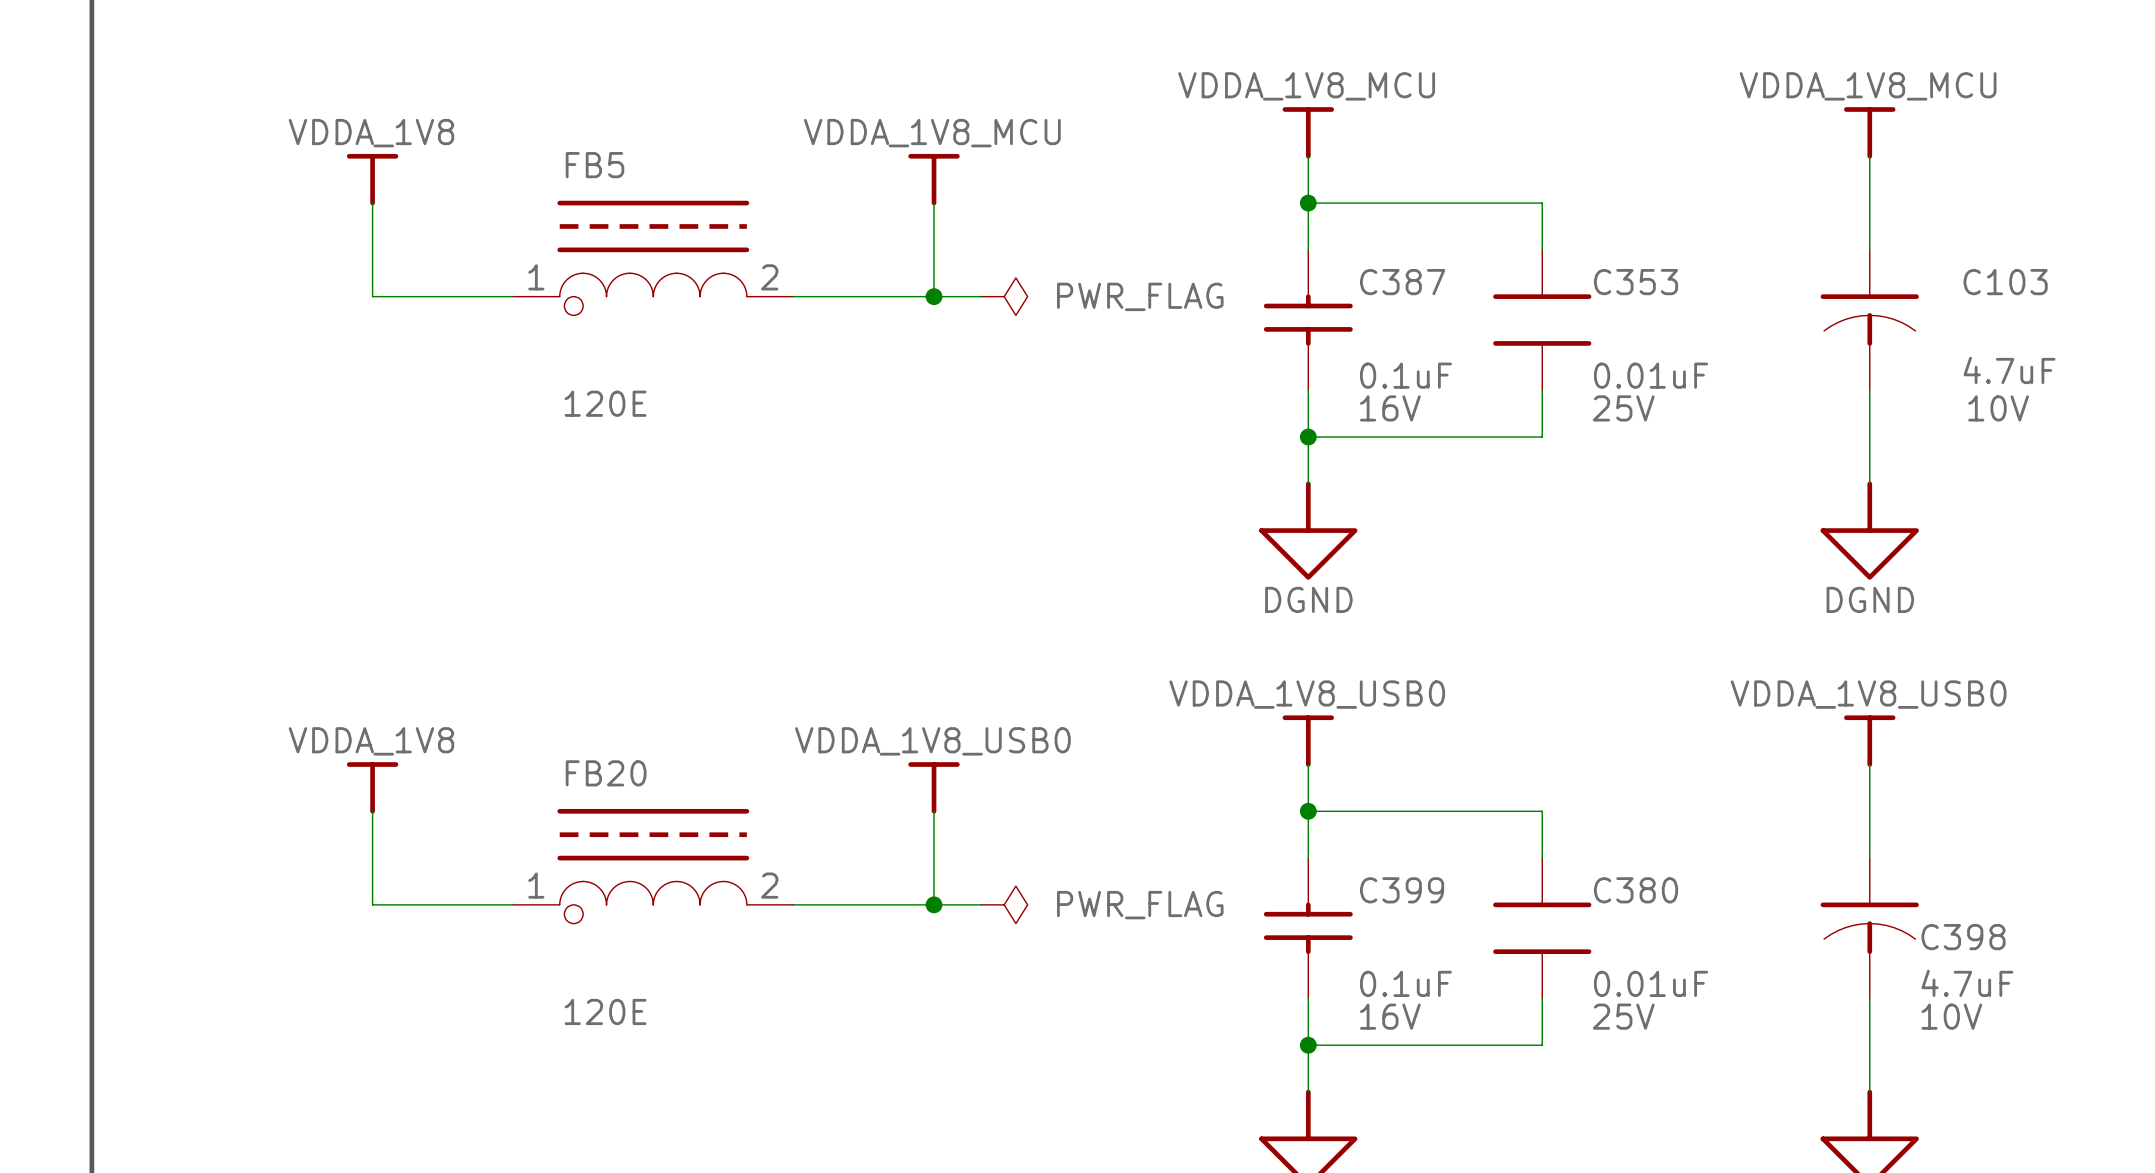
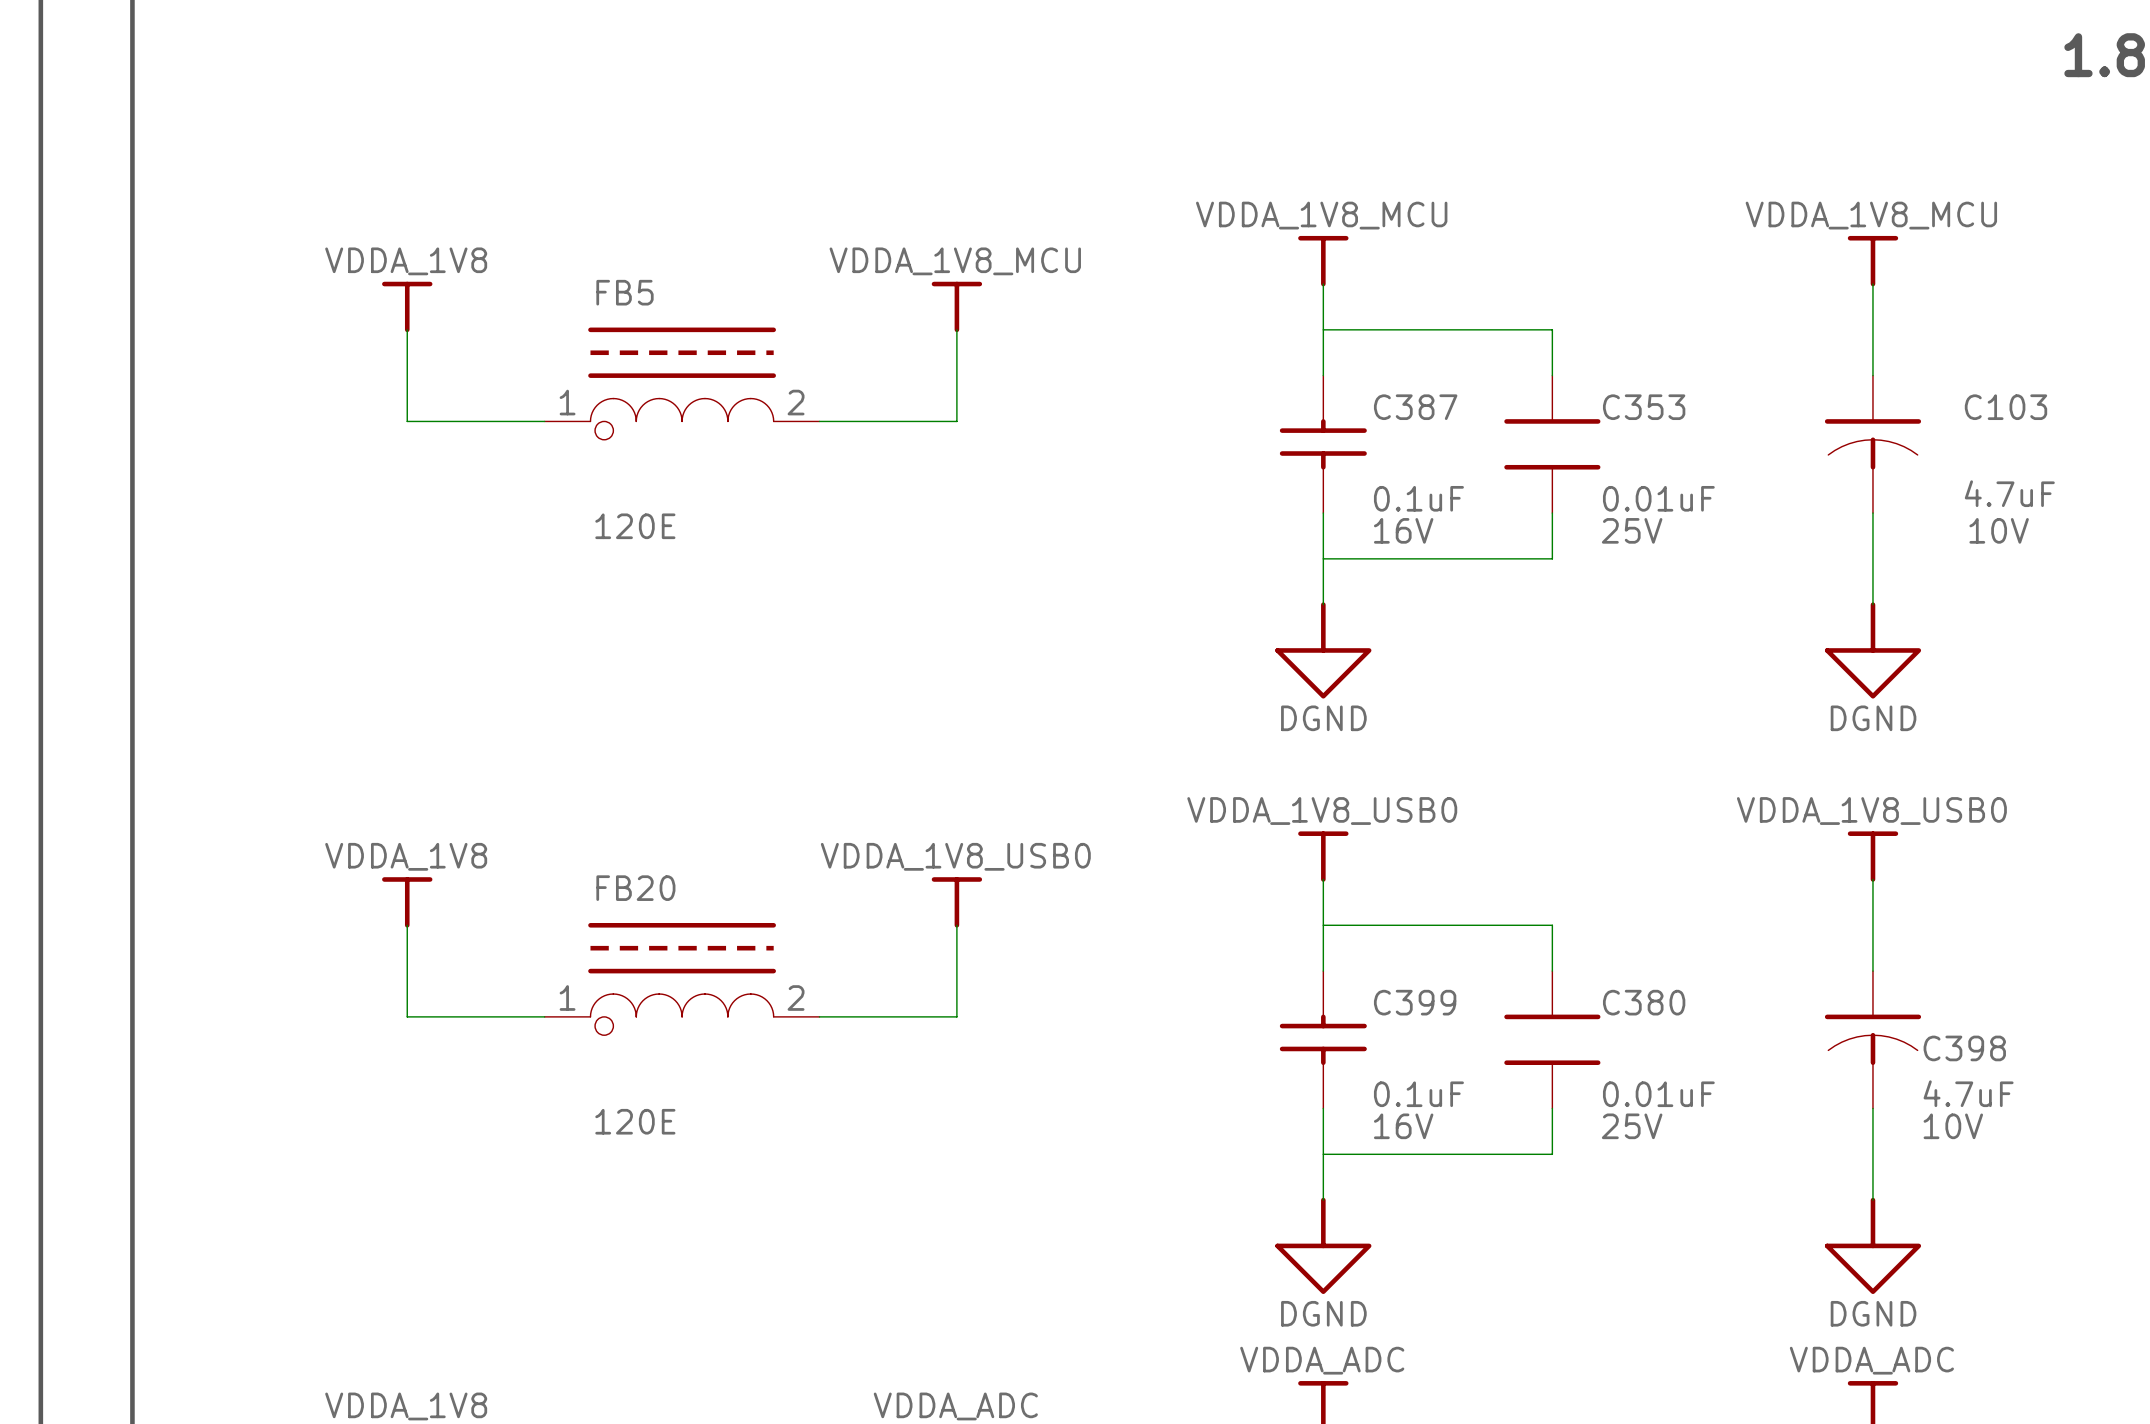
junction: (1308, 203) -> none
wire: (934, 296) (980, 296) -> none
junction: (934, 296) -> none
power symbol: PWR_FLAG (1004, 296) -> none
junction: (1308, 437) -> none
junction: (1308, 811) -> none
wire: (934, 904) (980, 904) -> none
junction: (934, 904) -> none
power symbol: PWR_FLAG (1004, 904) -> none
junction: (1308, 1045) -> none

